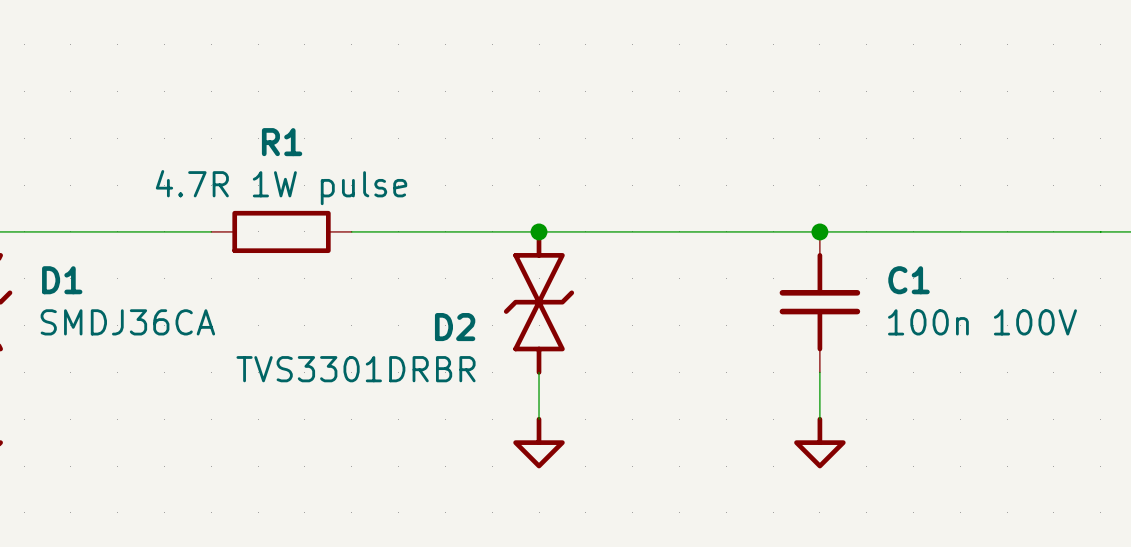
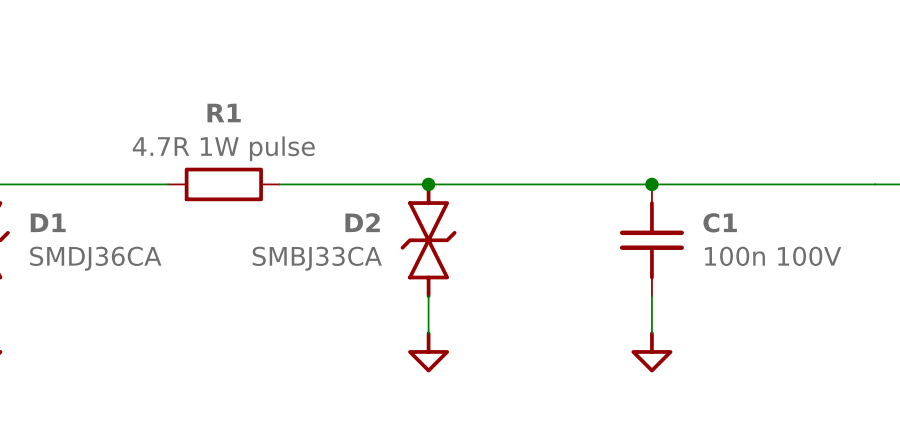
D2 name position: D2 (455, 327) -> D2 (362, 222)
D2 value: TVS3301DRBR (356, 369) -> SMBJ33CA (317, 258)

